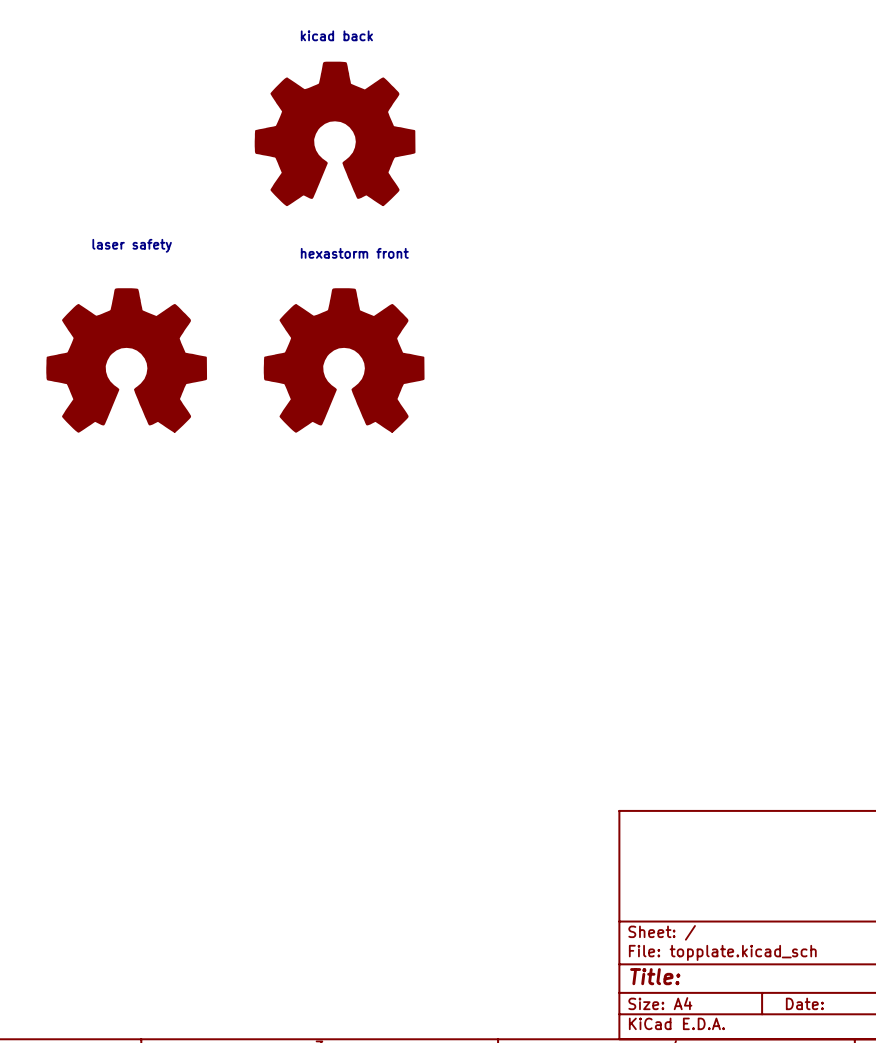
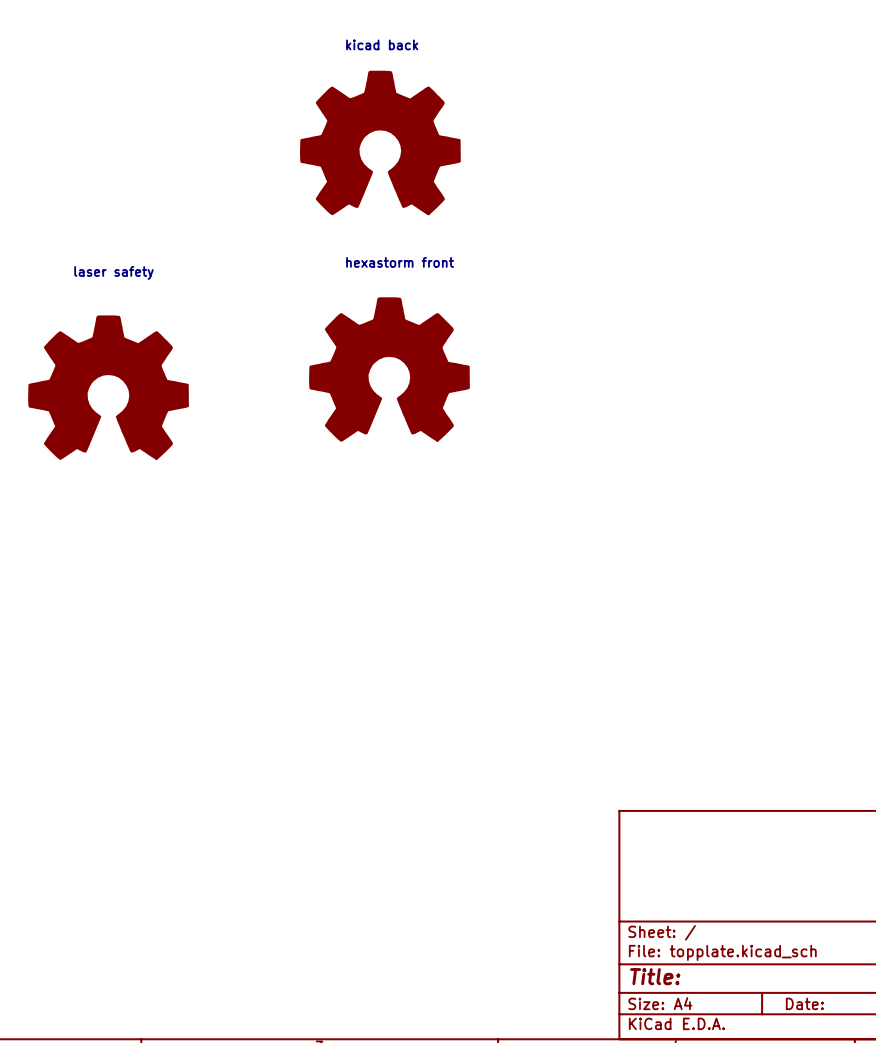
text position: kicad back (336, 35) -> kicad back (382, 44)
part position: (335, 133) -> (380, 142)
text position: laser safety (132, 245) -> laser safety (114, 272)
text position: hexastorm front (354, 253) -> hexastorm front (400, 262)
part position: (126, 360) -> (108, 387)
part position: (344, 360) -> (389, 369)

